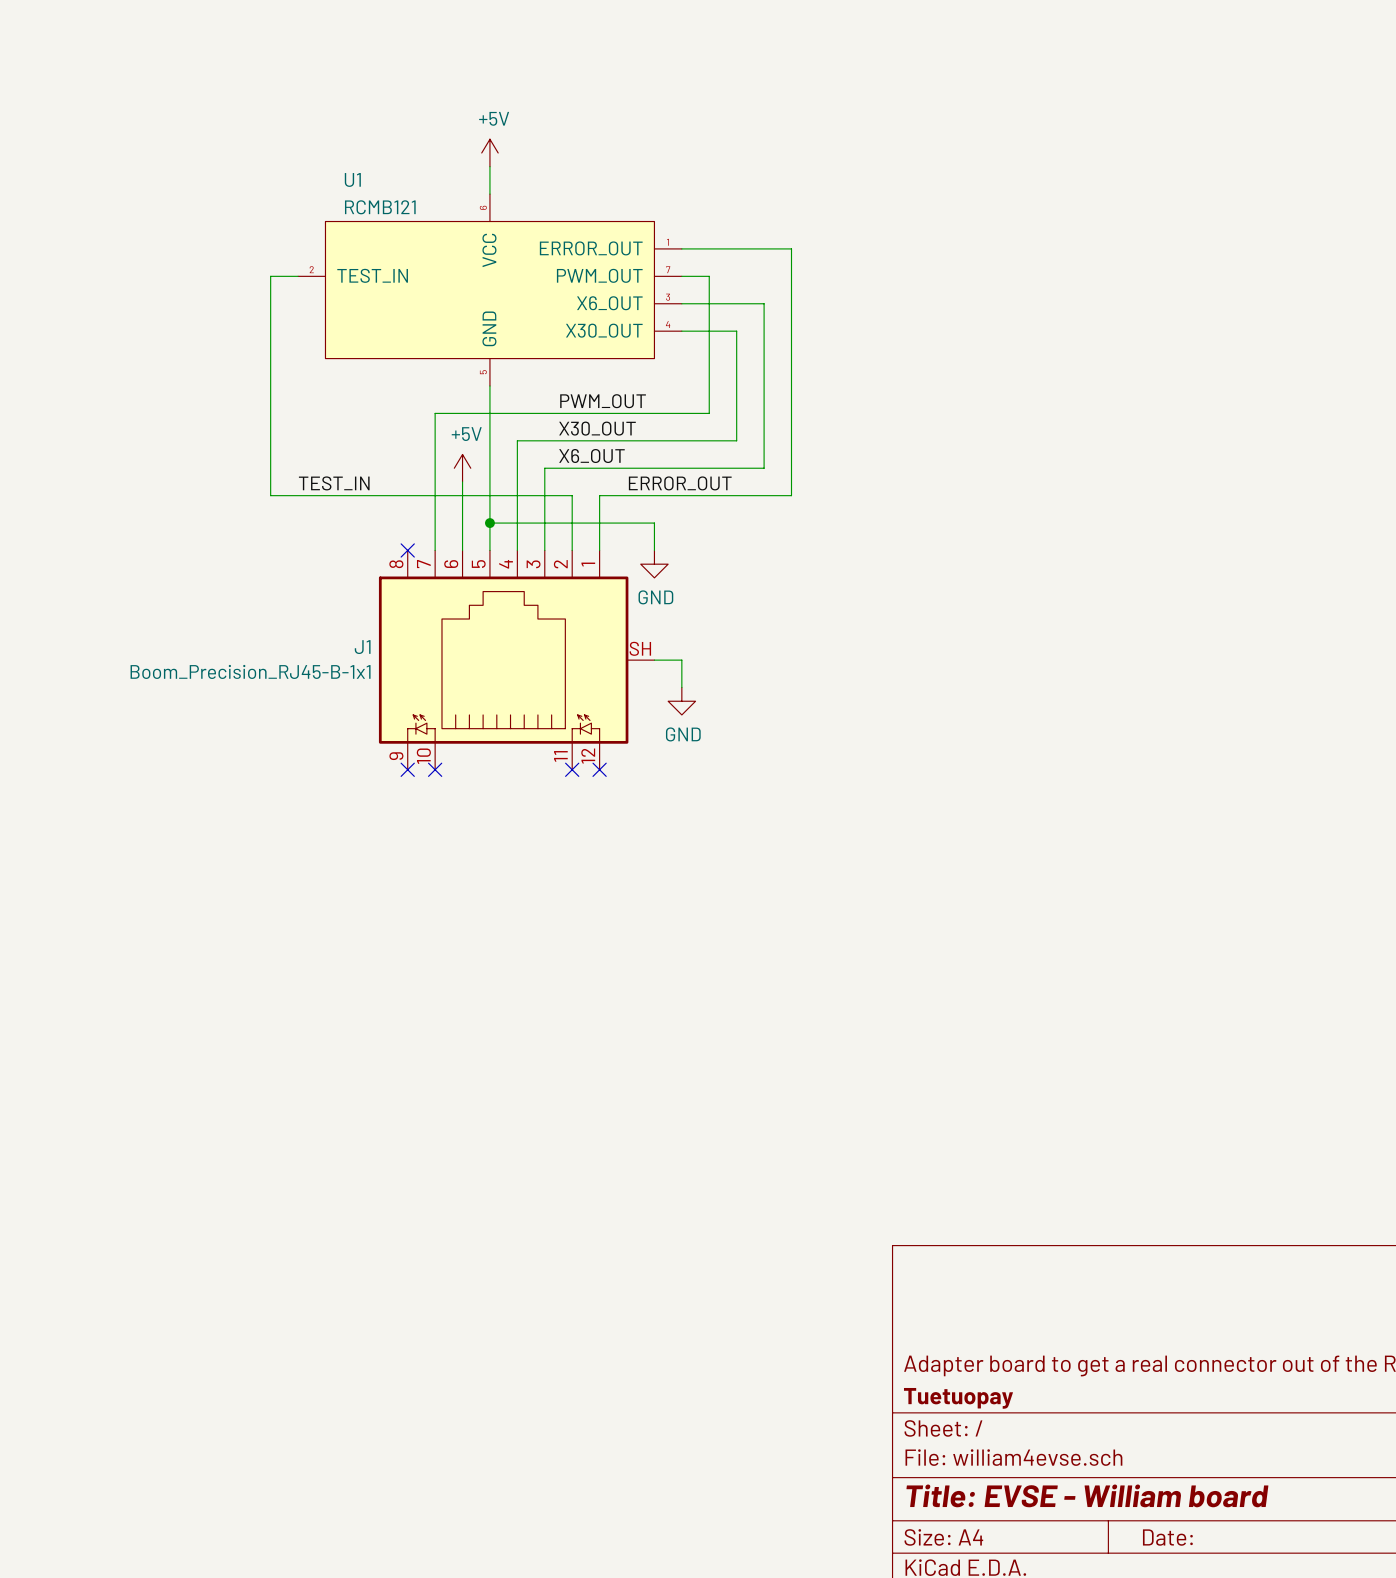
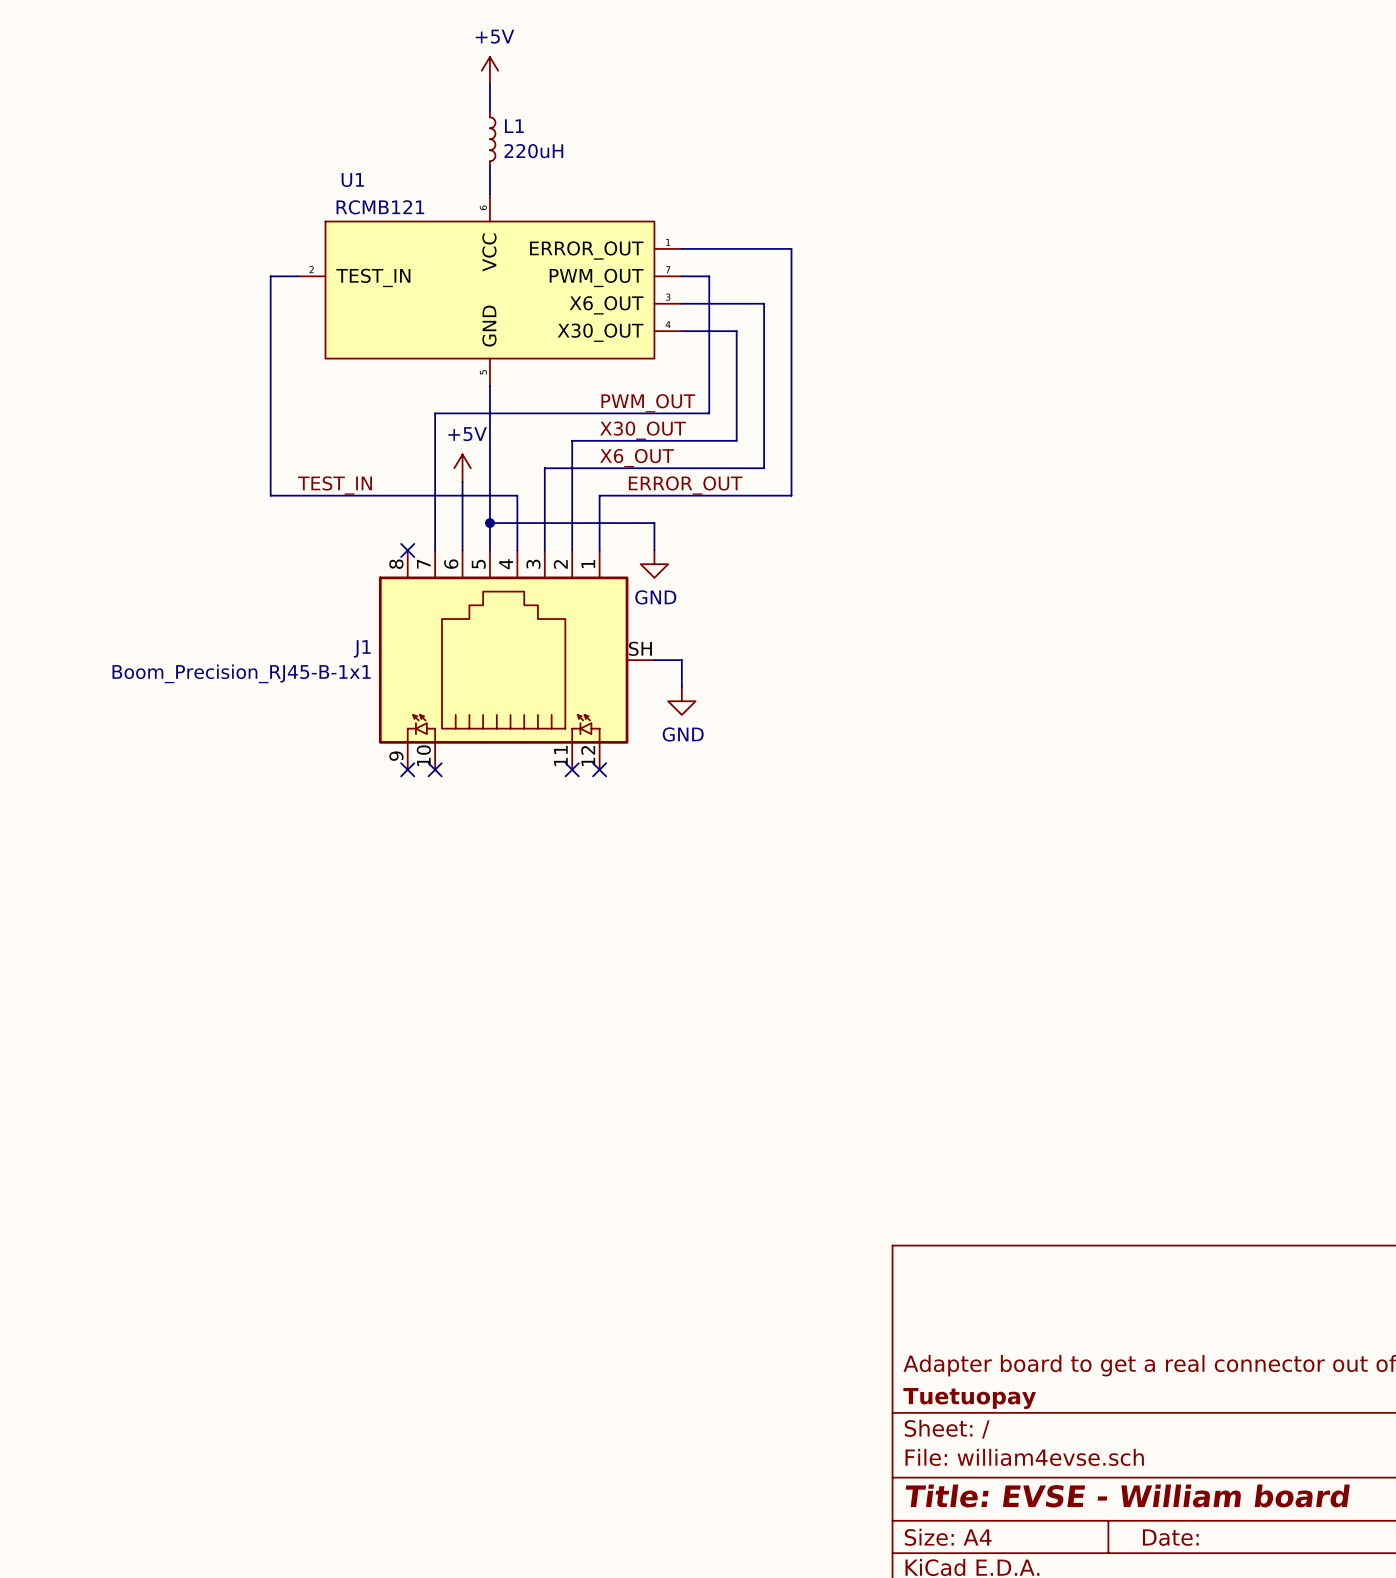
wire: none -> (489, 84) (489, 111)
L1: none -> 220uH (492, 139)
power symbol position: +5V (489, 152) -> +5V (489, 70)
label position: PWM_OUT (603, 401) -> PWM_OUT (648, 403)
label position: X30_OUT (597, 428) -> X30_OUT (643, 430)
wire: (572, 440) (517, 440) (517, 495) (572, 495) -> (572, 440) (572, 495)
label position: X6_OUT (591, 456) -> X6_OUT (637, 458)

